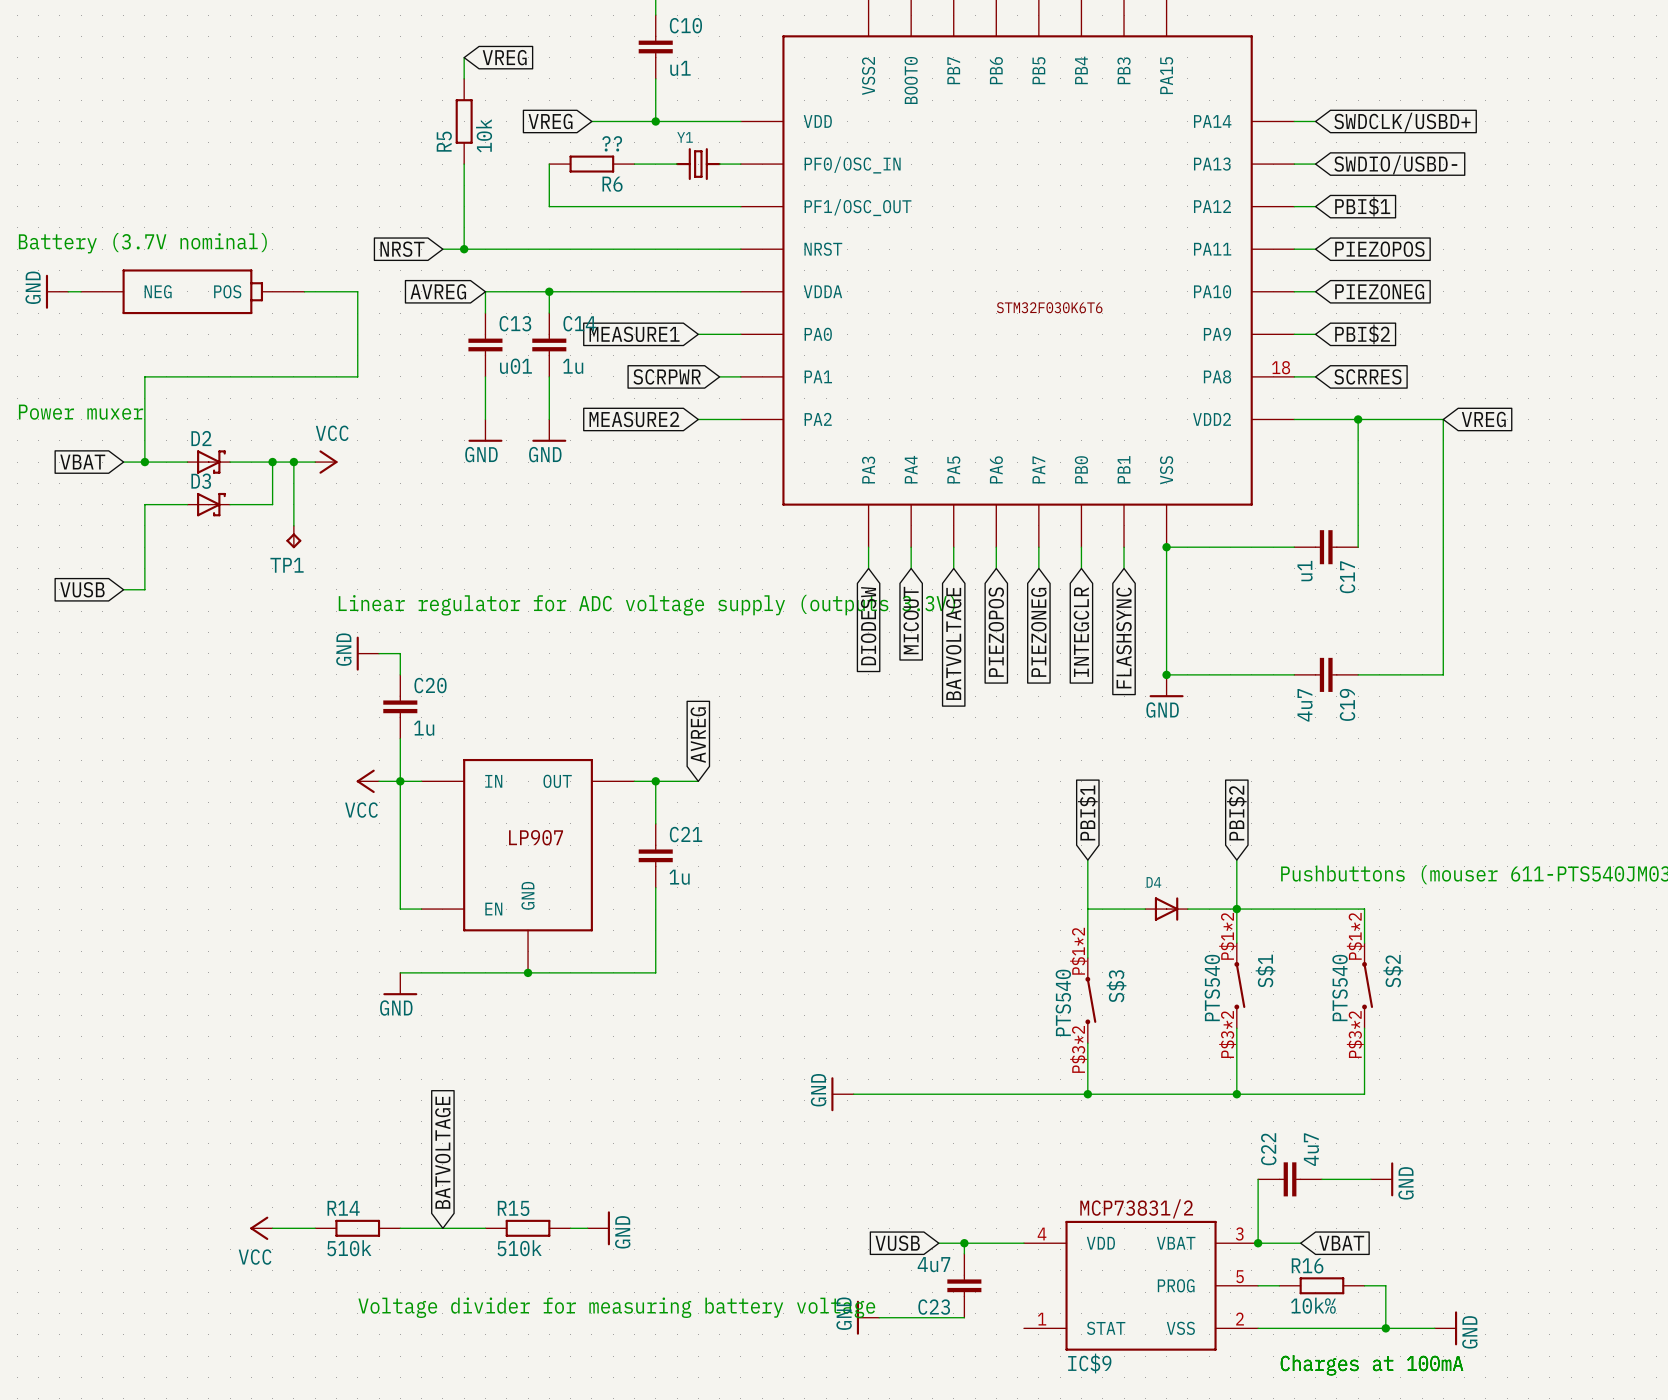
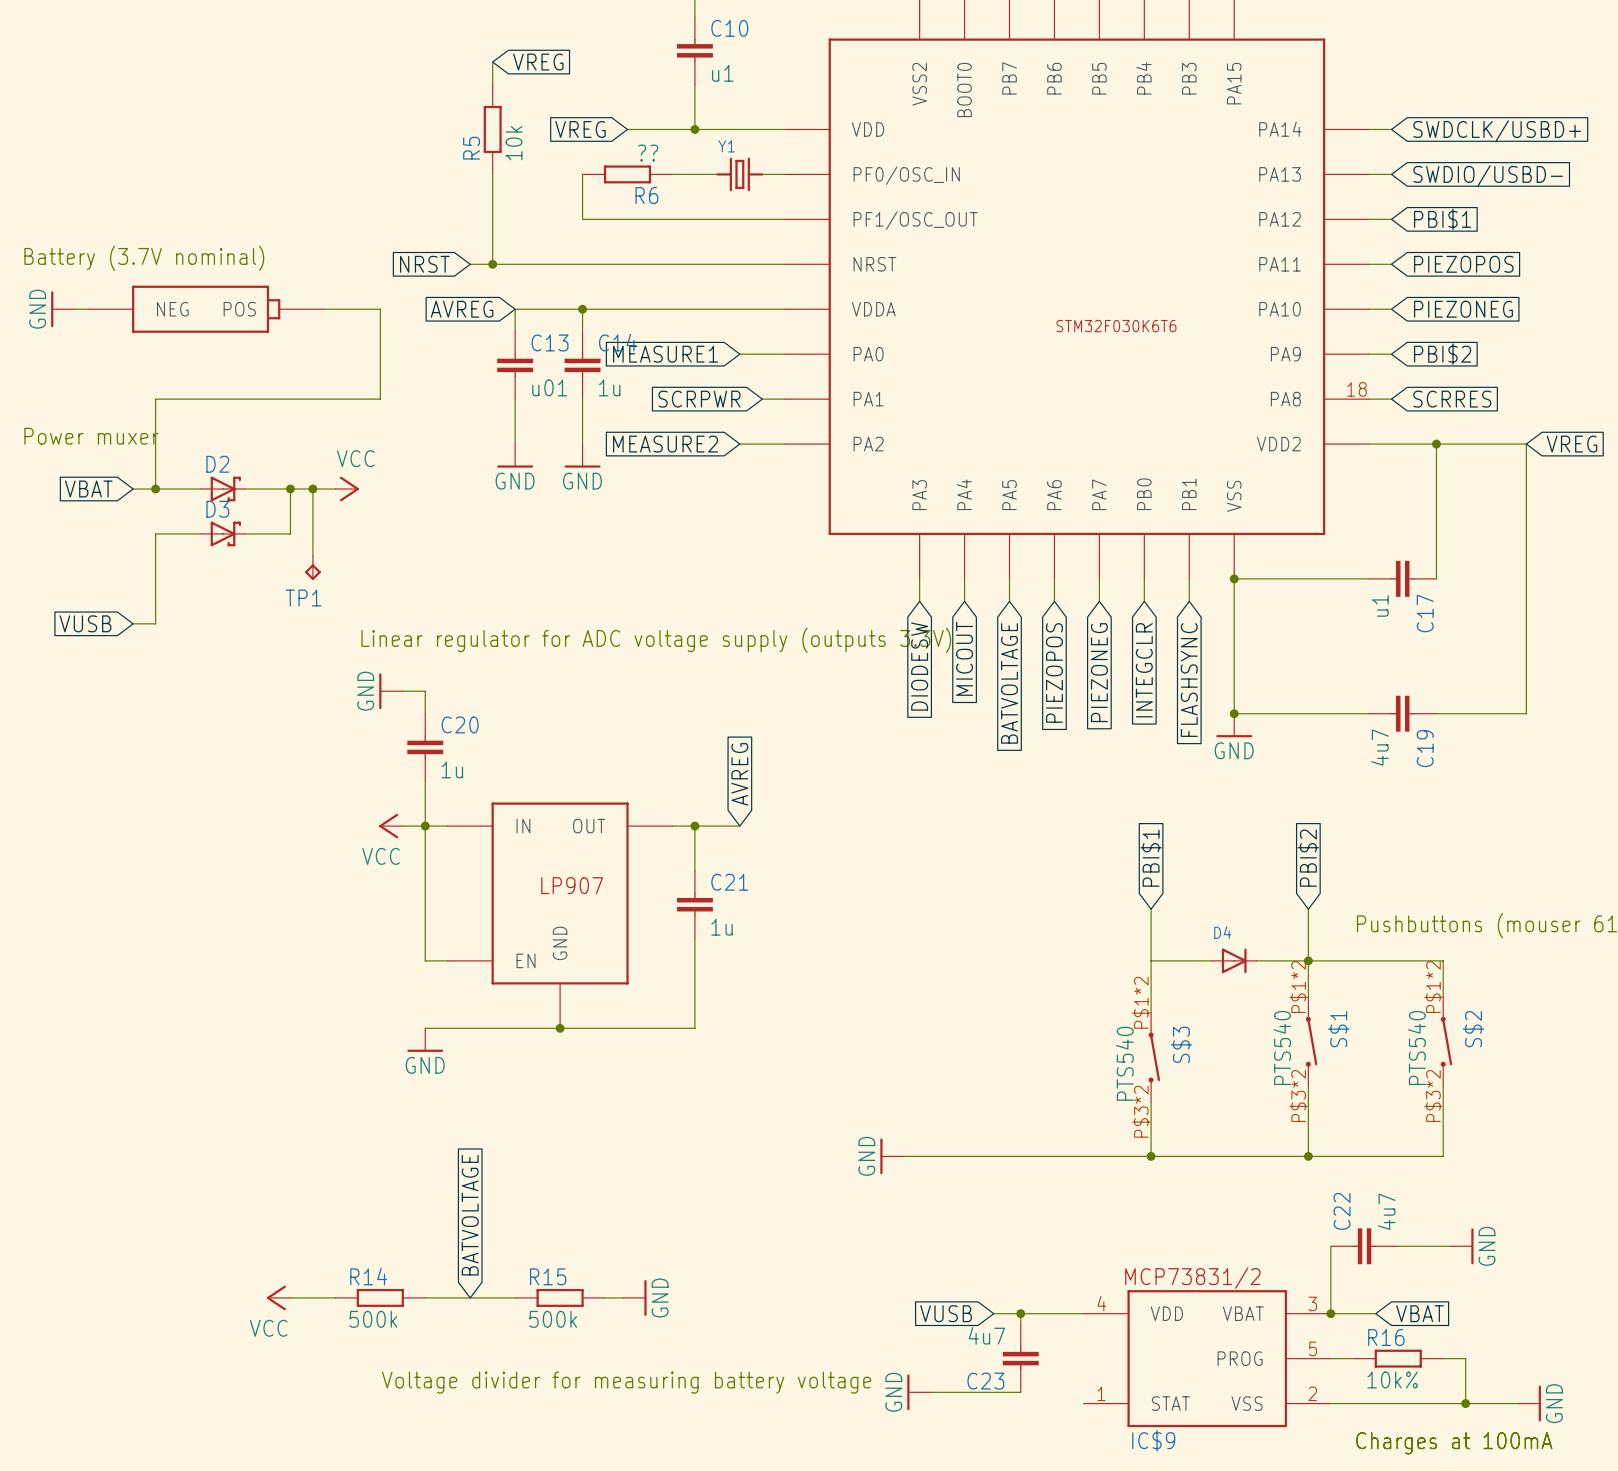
R14 value: 510k (349, 1248) -> 500k (373, 1319)
R15 value: 510k (519, 1248) -> 500k (553, 1319)

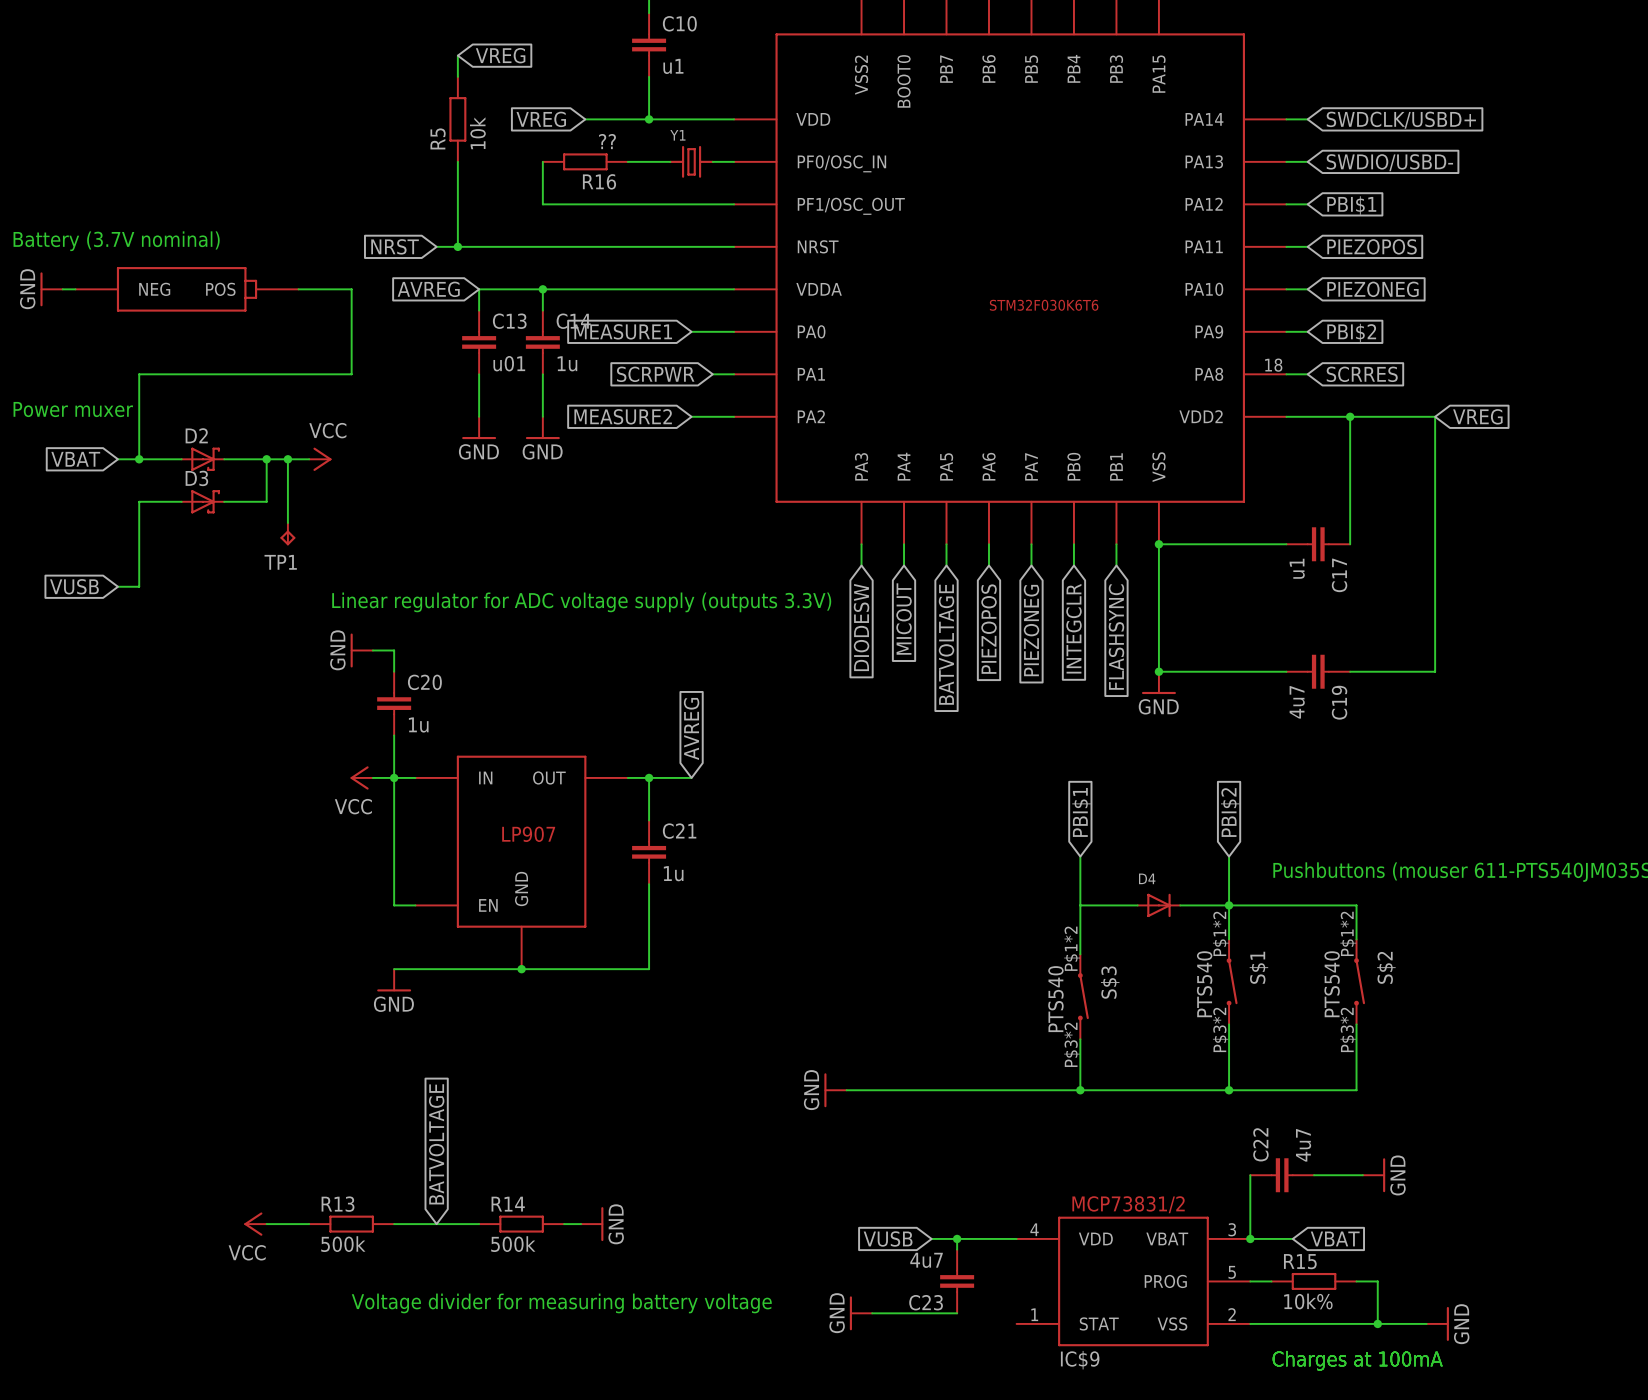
R6 name: R6 (646, 195) -> R16 (599, 181)
R14 name: R14 (368, 1276) -> R13 (338, 1204)
R15 name: R15 (548, 1276) -> R14 (508, 1204)
R16 name: R16 (1386, 1337) -> R15 (1300, 1261)

